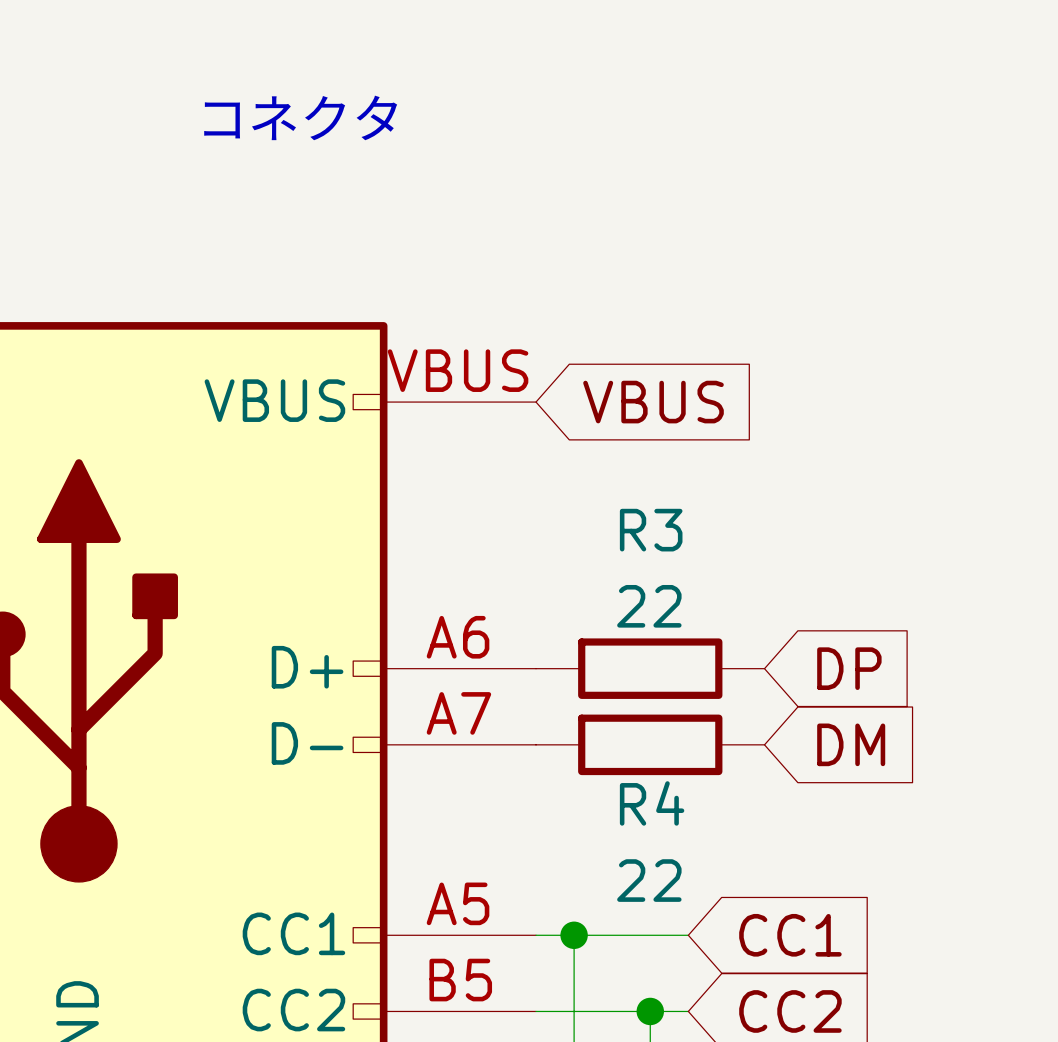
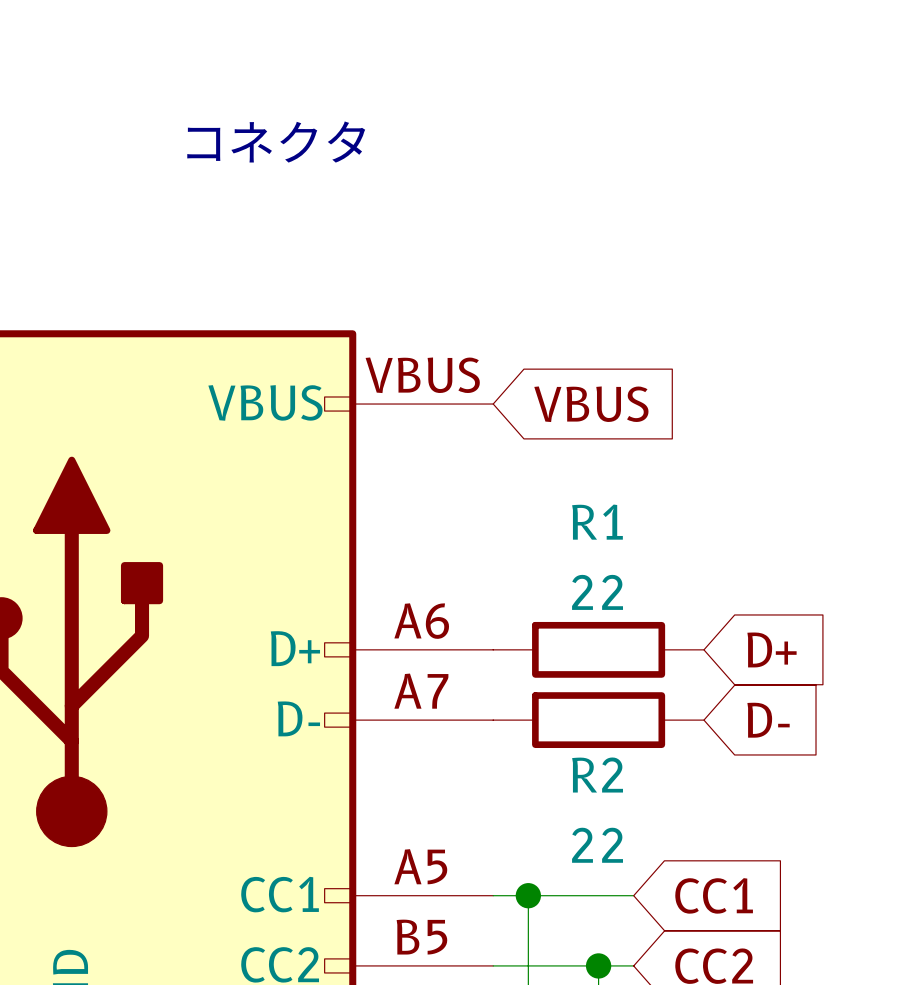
R3 name: R3 (651, 530) -> R1 (597, 522)
global label: DP (849, 668) -> D+ (772, 649)
global label: DM (851, 744) -> D- (768, 720)
R4 name: R4 (652, 803) -> R2 (597, 775)

